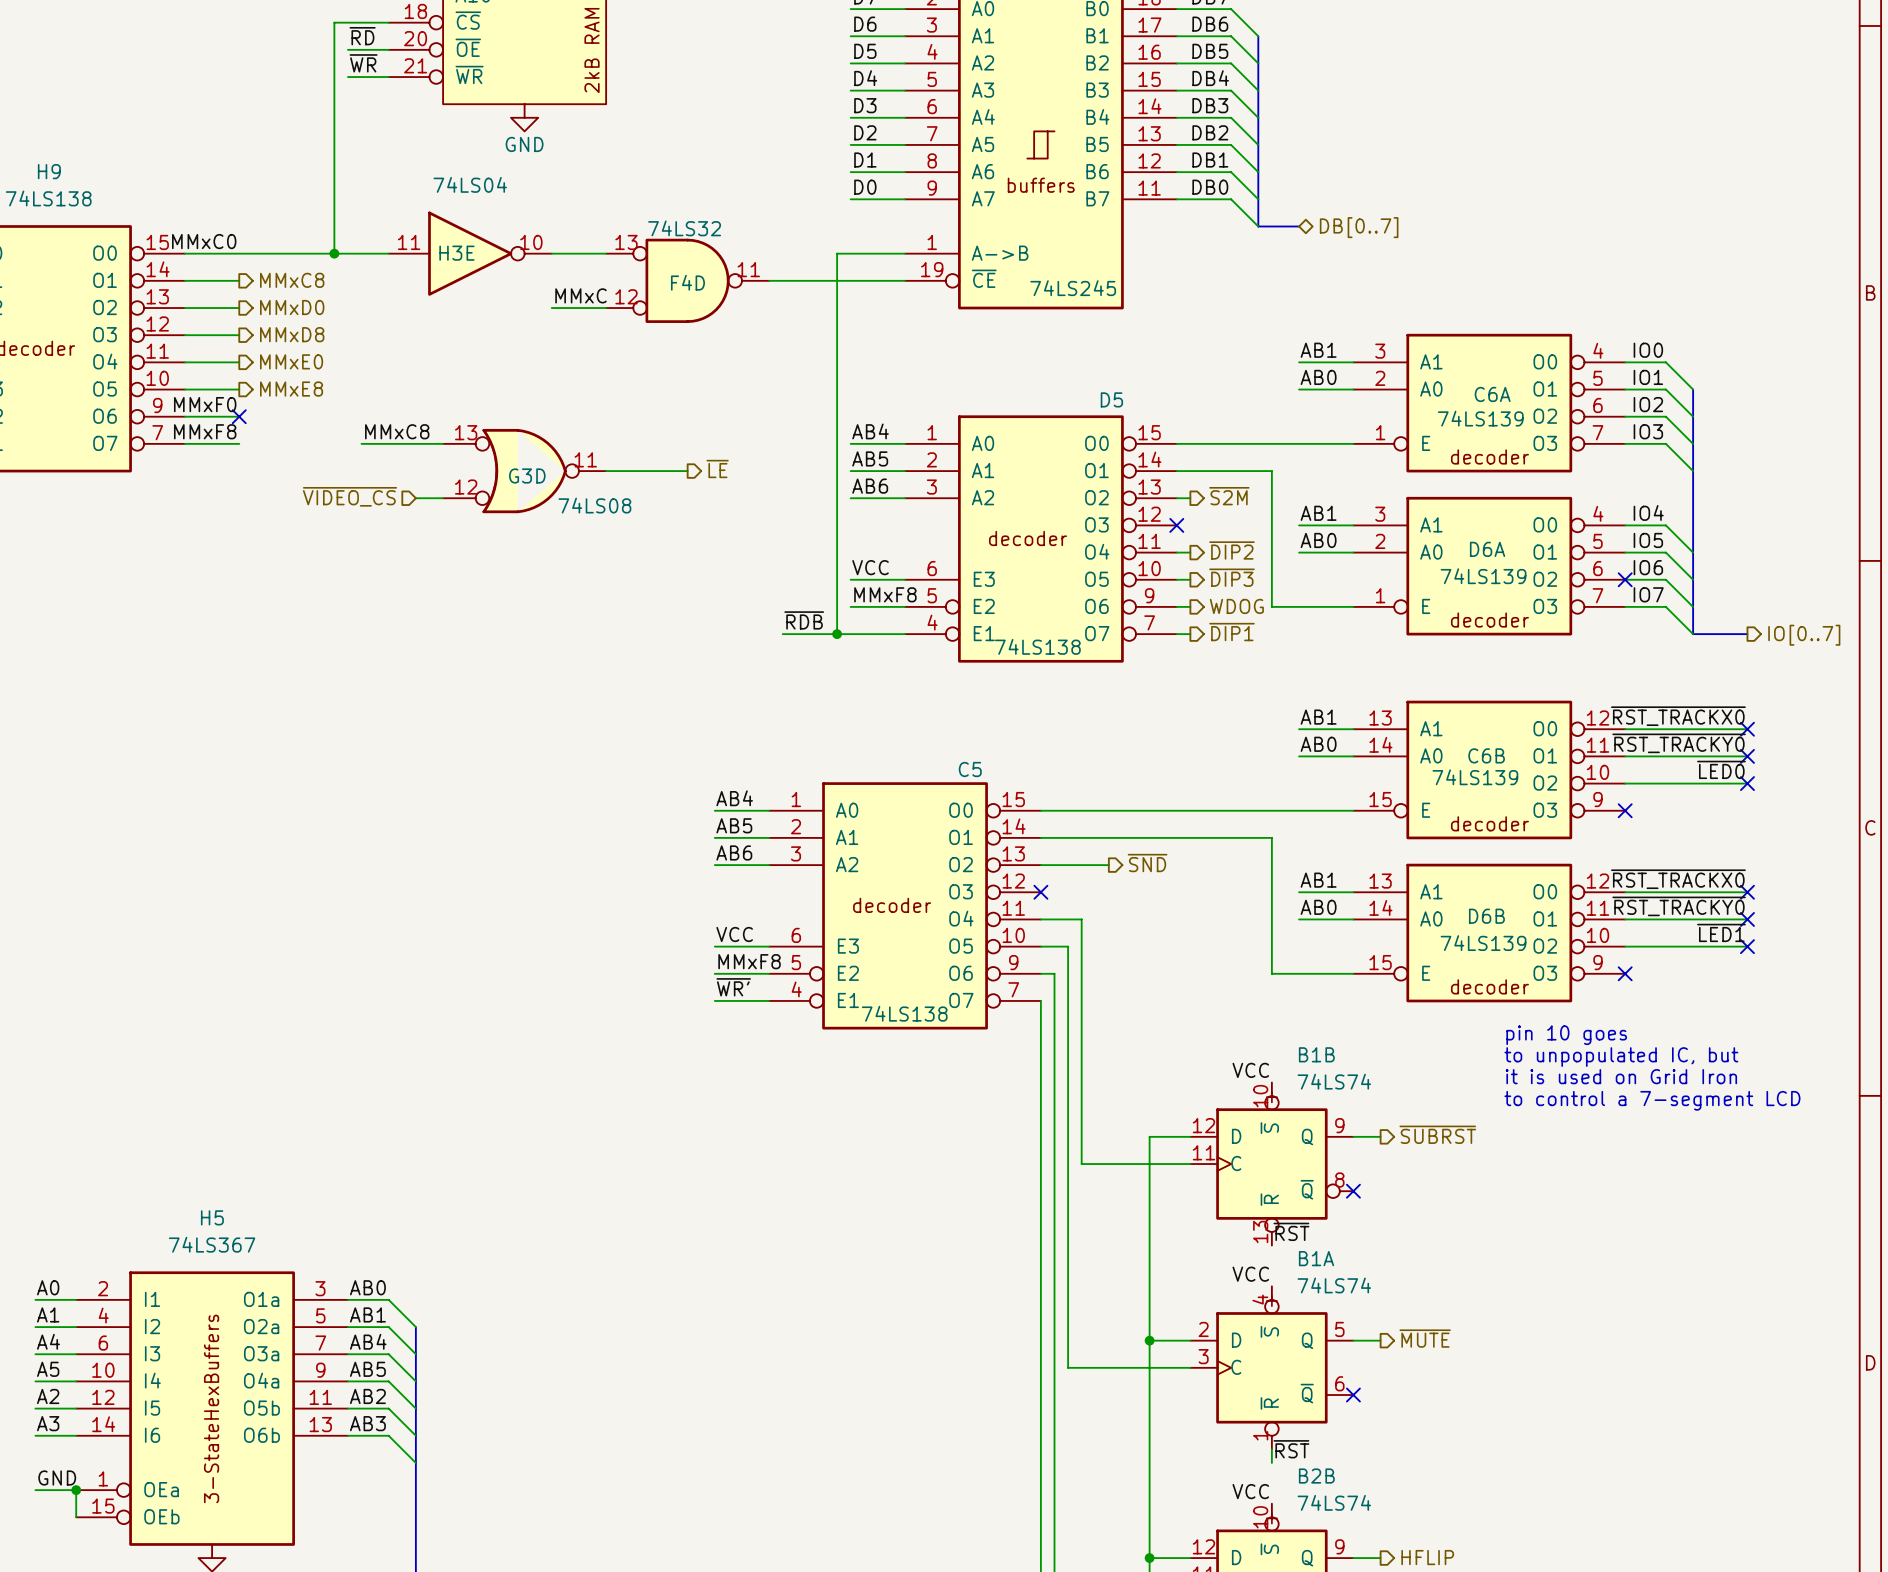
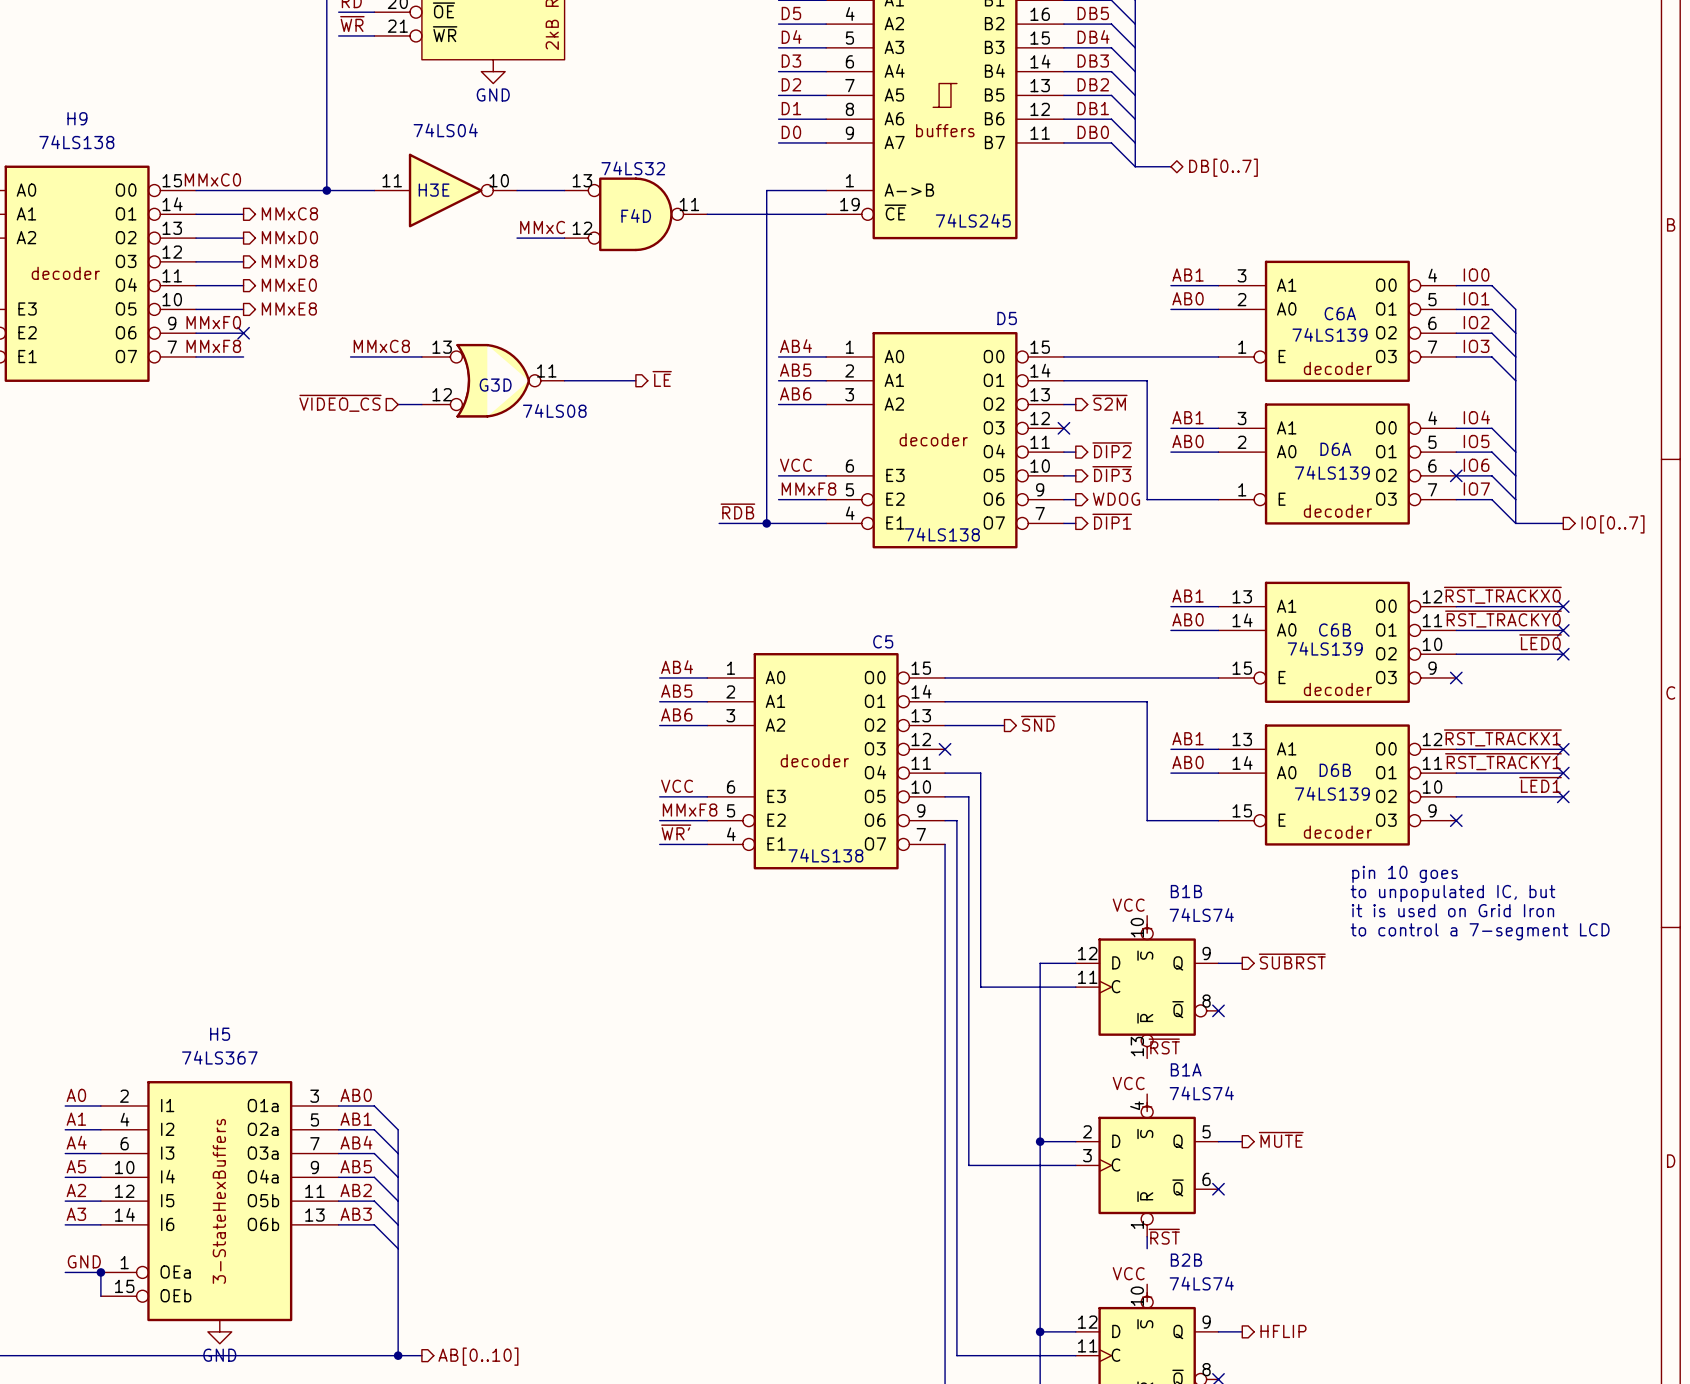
label: ~{RST_TRACKX0} (1678, 879) -> ~{RST_TRACKX1} (1502, 737)
label: ~{RST_TRACKY0} (1679, 906) -> ~{RST_TRACKY1} (1503, 761)

